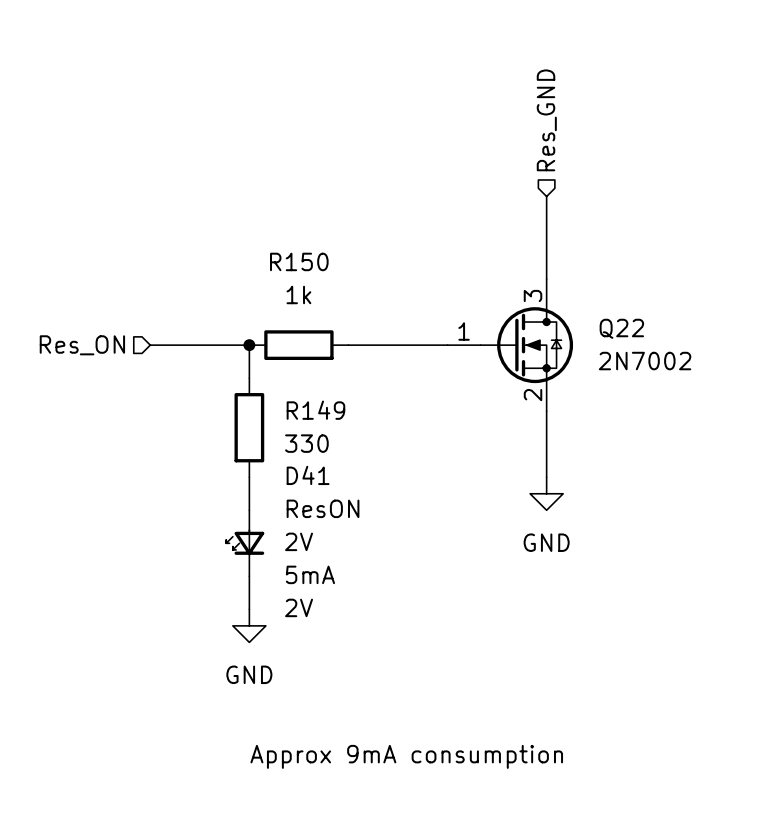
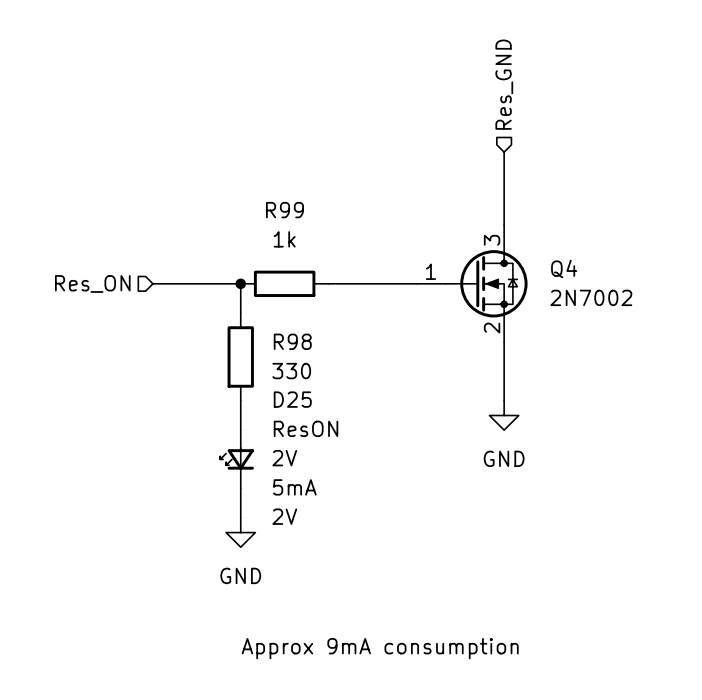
R150 name: R150 (299, 261) -> R99 (284, 210)
Q22 name: Q22 (621, 328) -> Q4 (564, 268)
R149 name: R149 (315, 410) -> R98 (292, 341)
D41 name: D41 (308, 475) -> D25 (292, 399)

